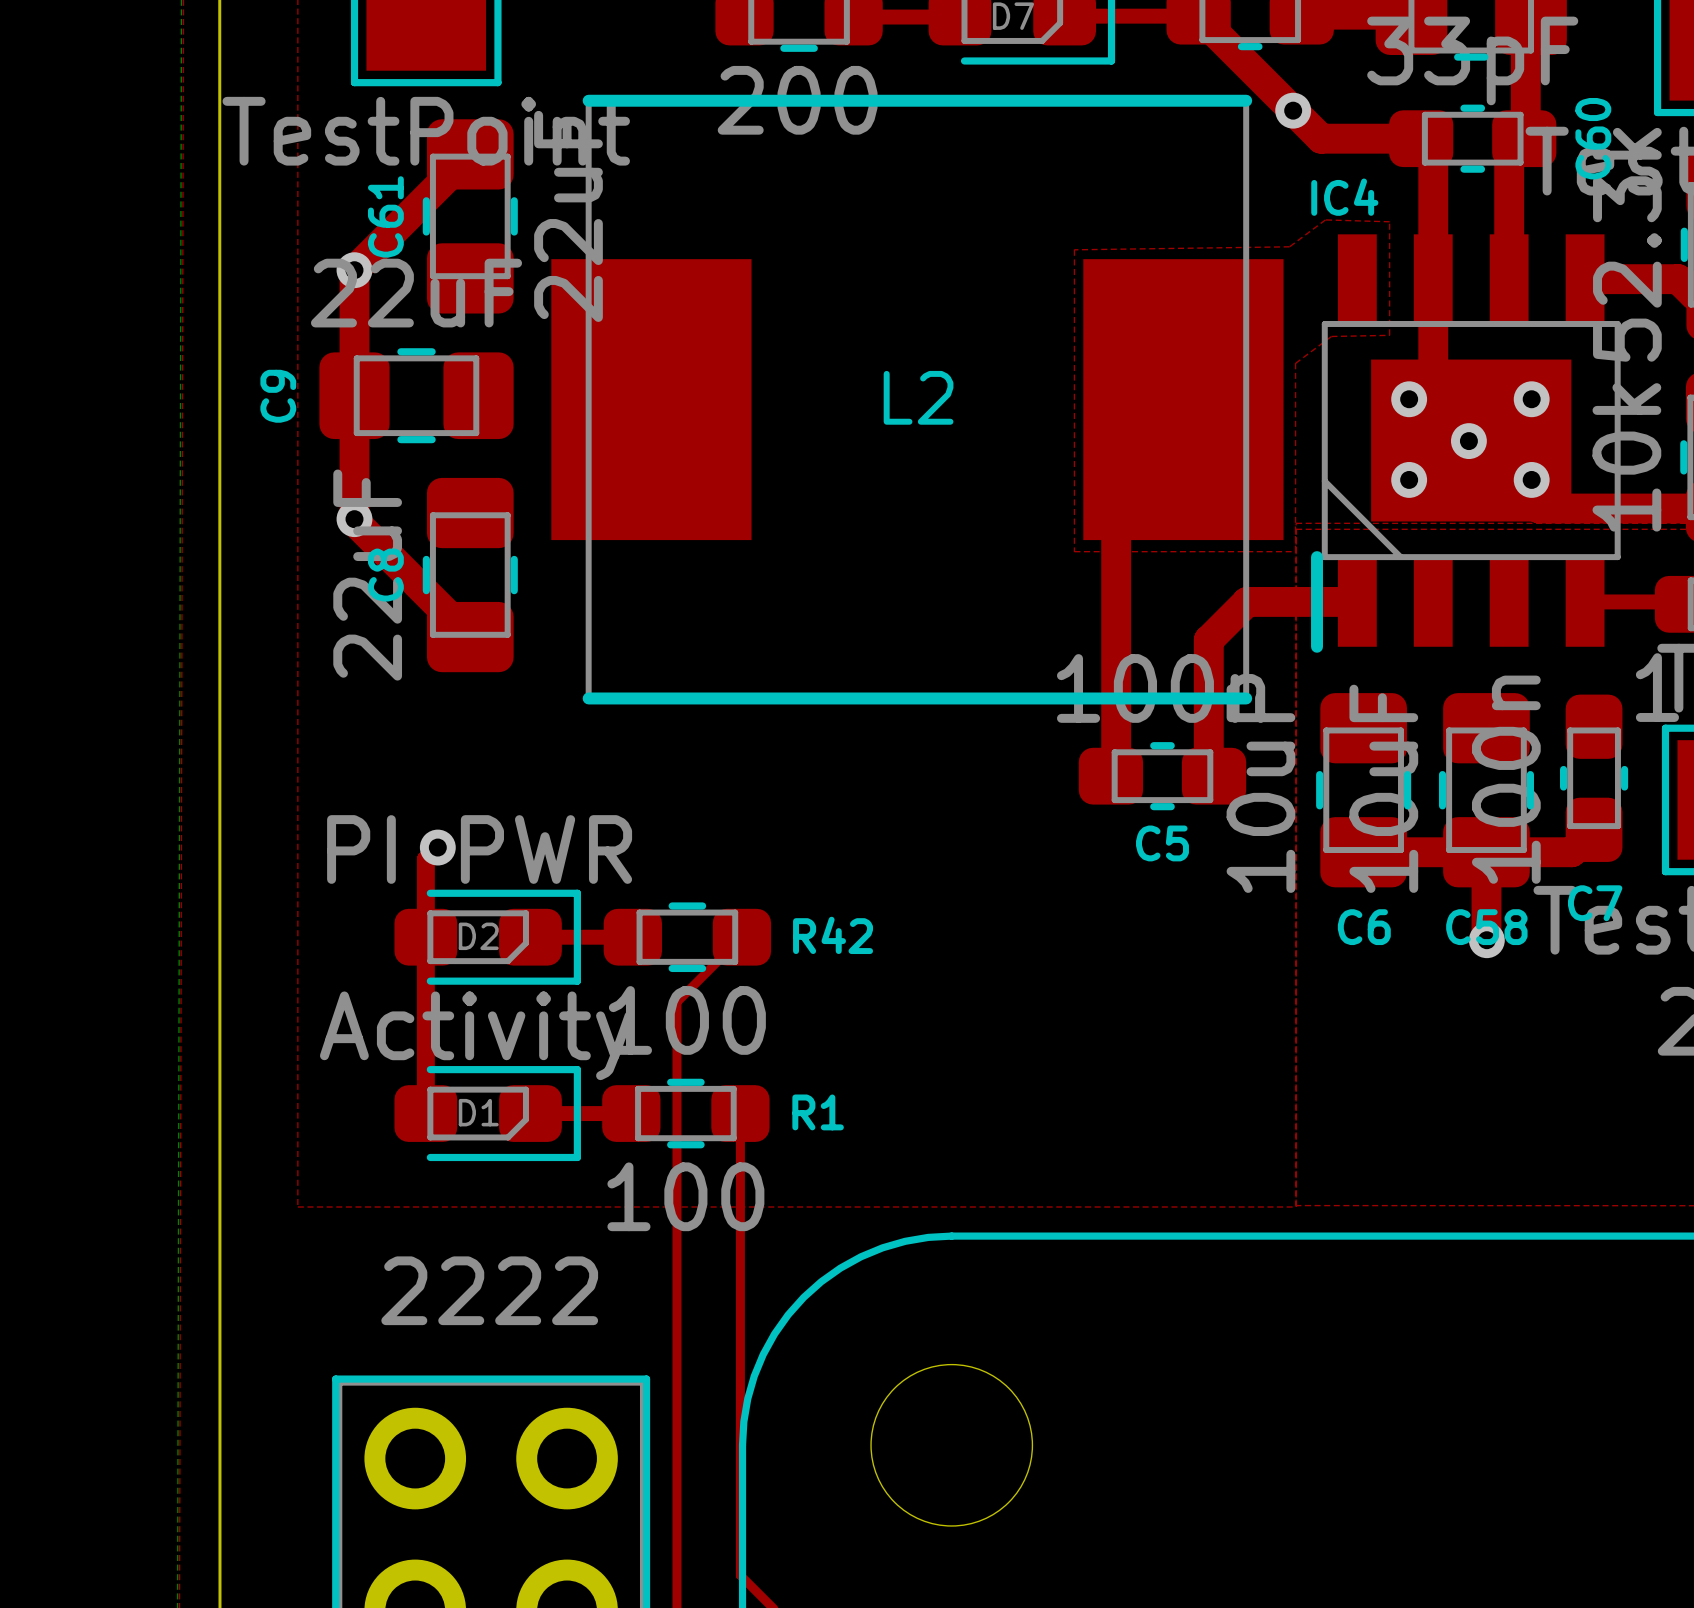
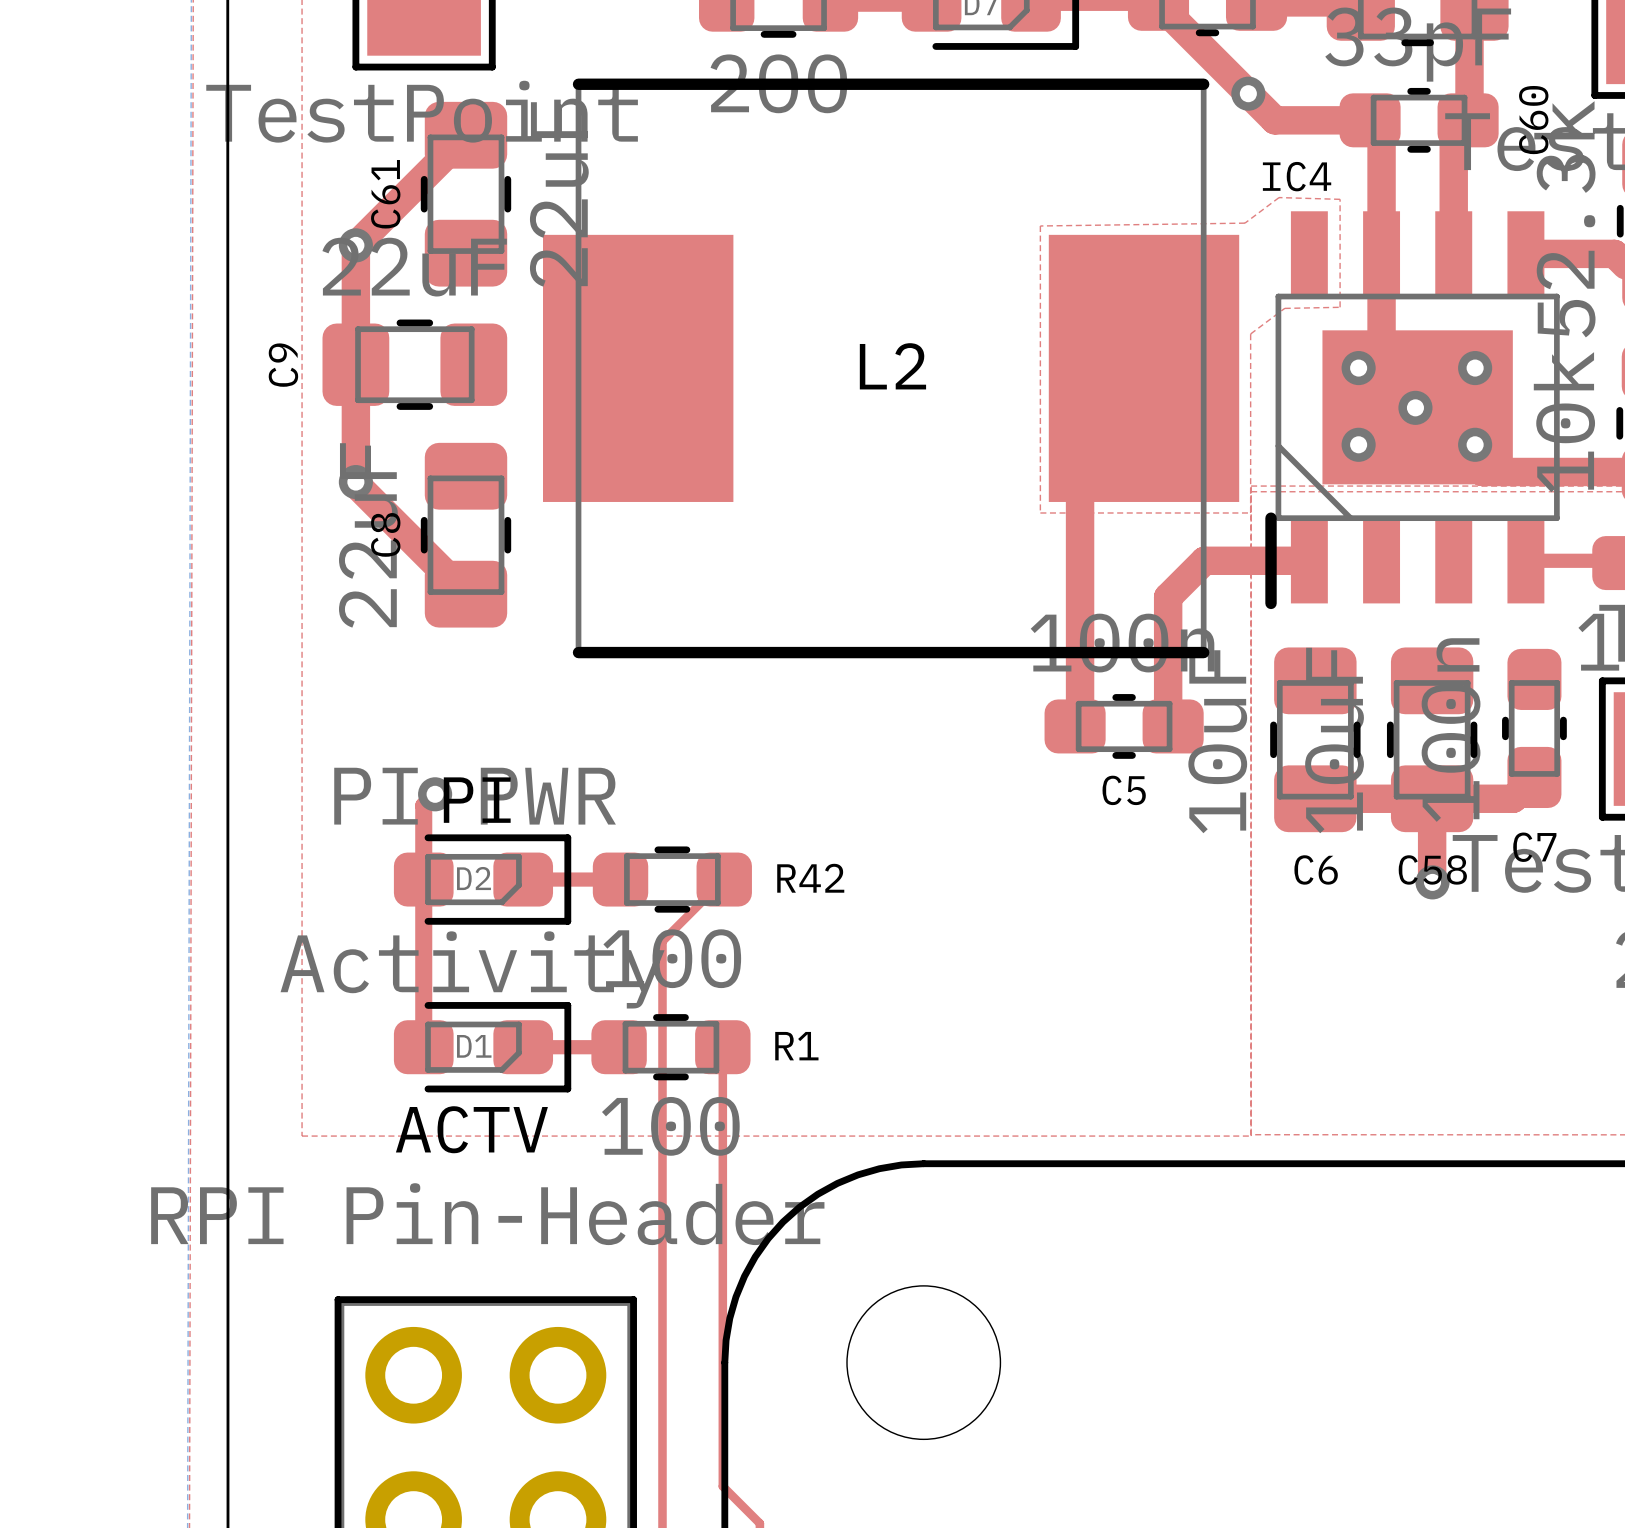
text: none -> PI (477, 800)
text: none -> ACTV (471, 1129)
part value: 2222 (489, 1290) -> RPI Pin-Header (487, 1214)

